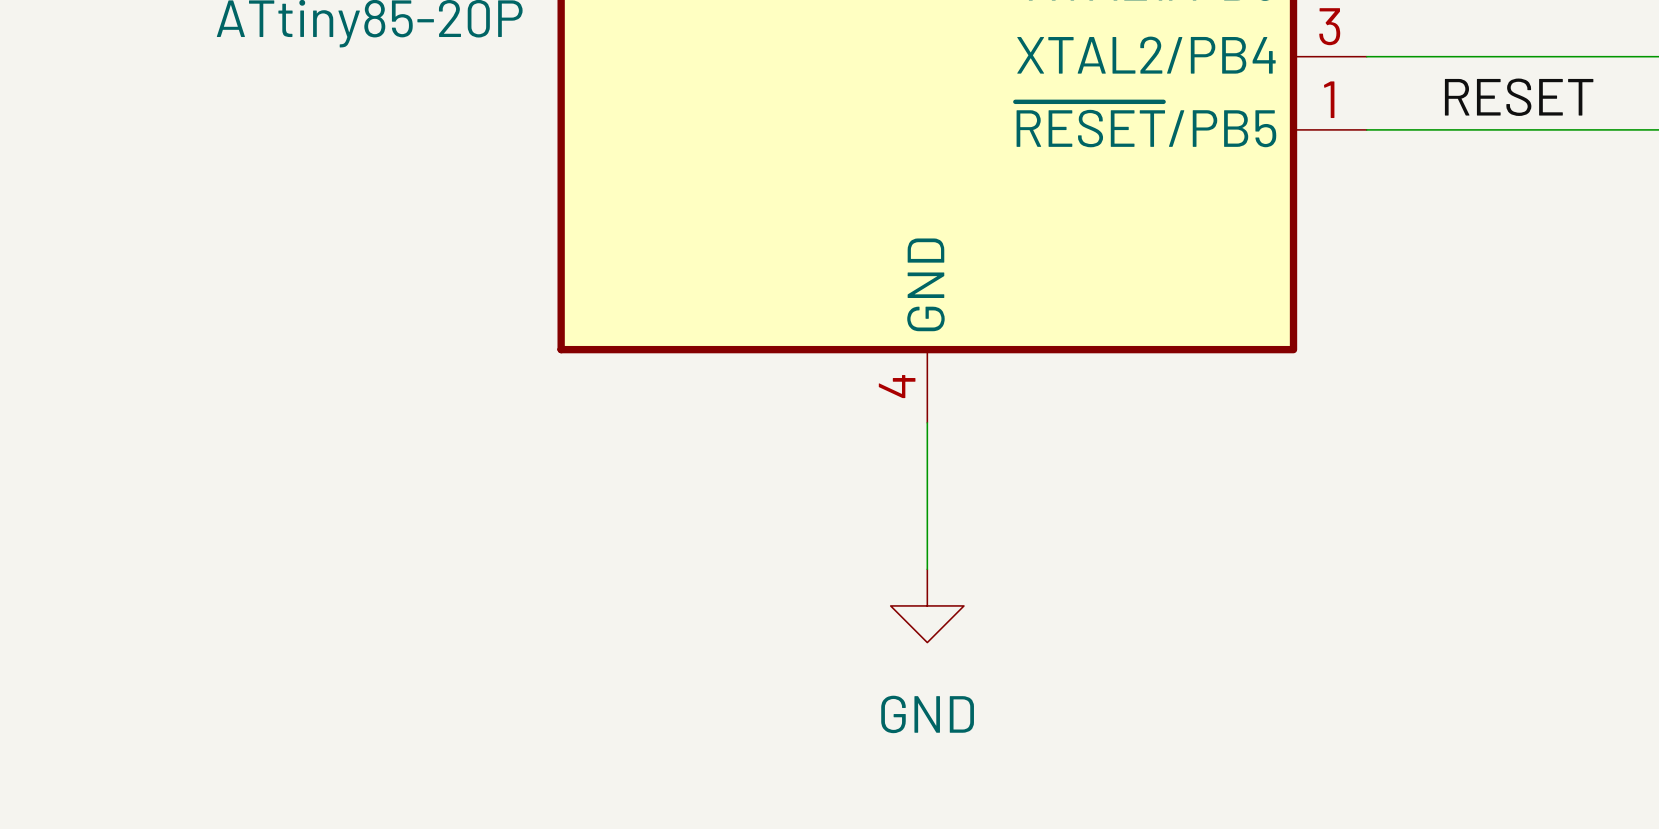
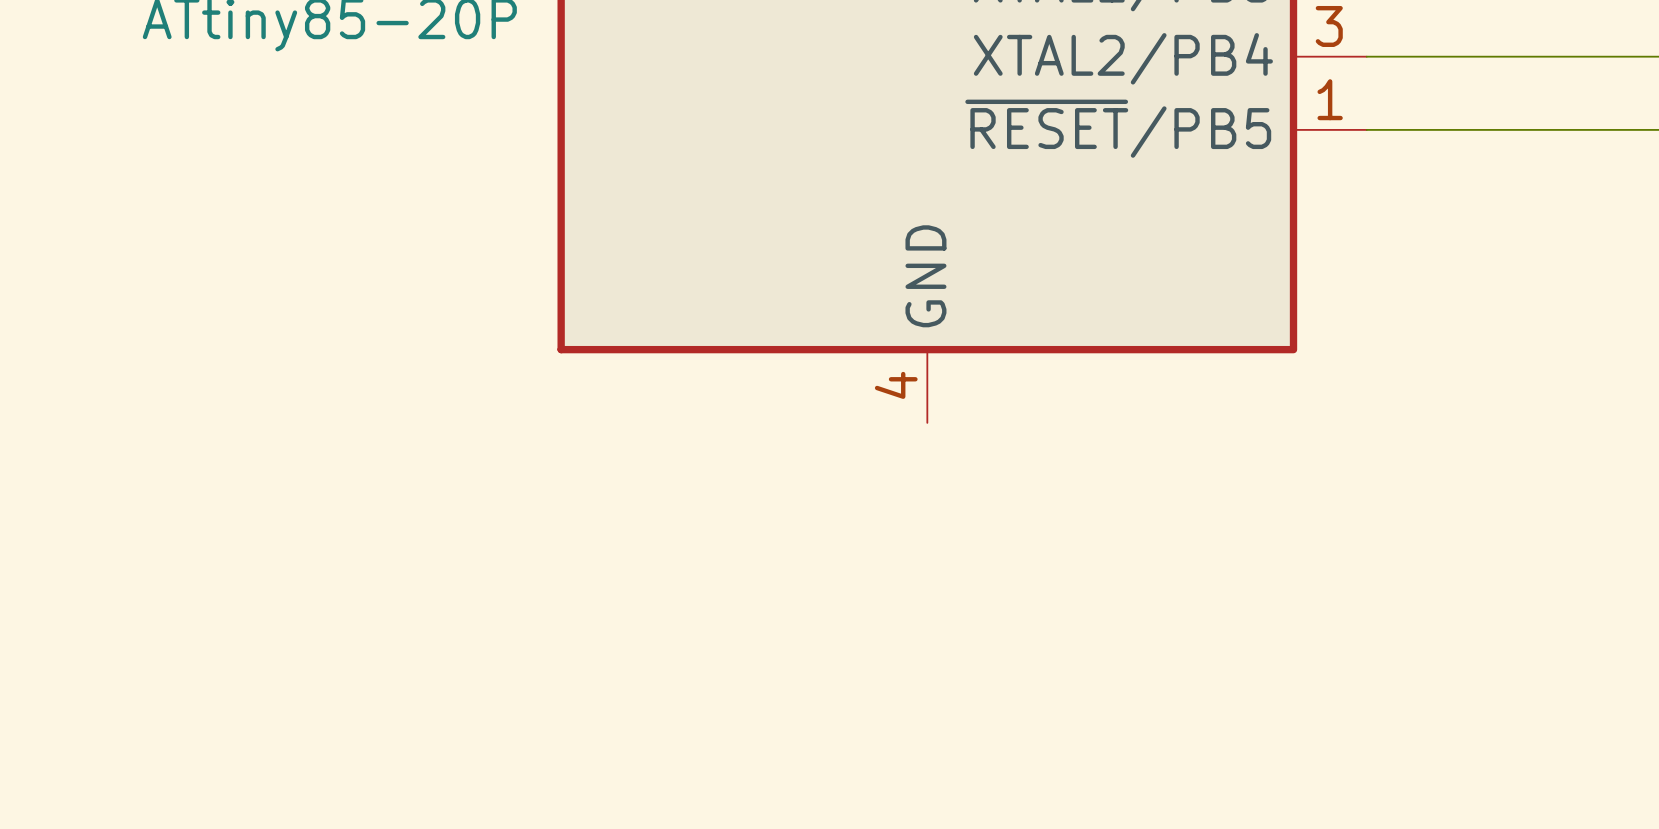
label: RESET (1519, 97) -> none
wire: (927, 422) (927, 569) -> none
power symbol: GND (927, 605) -> none

